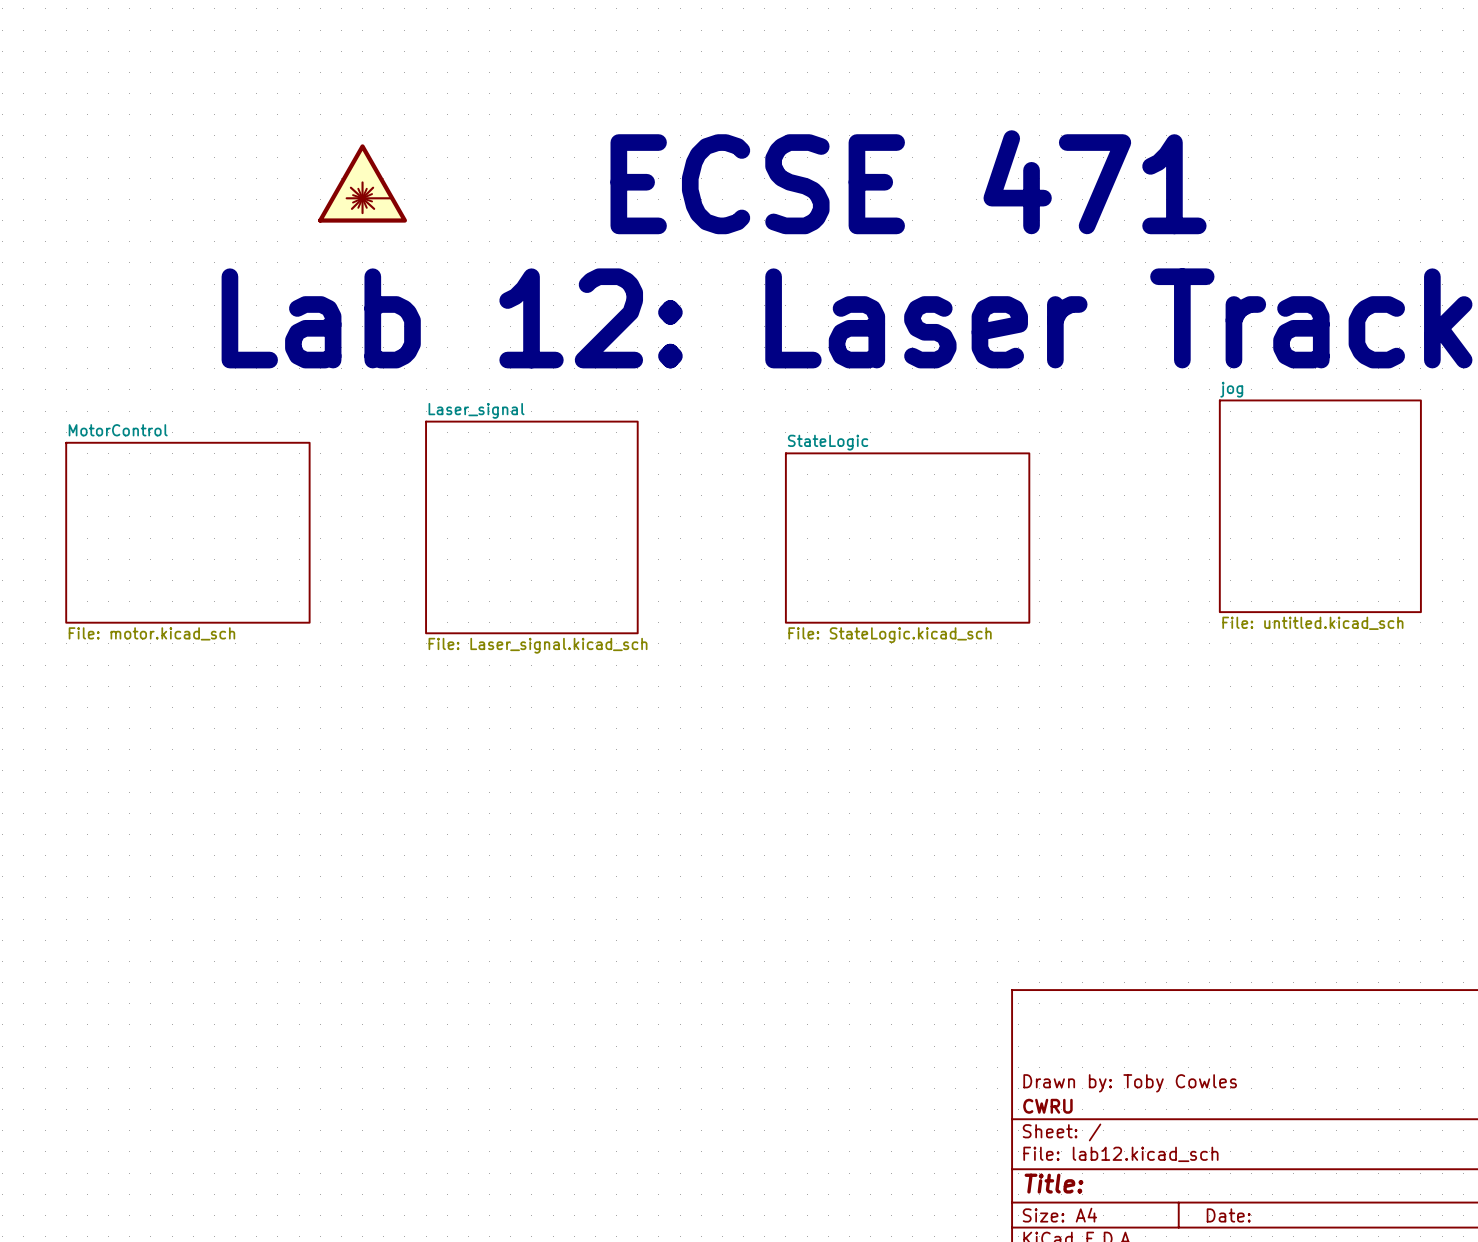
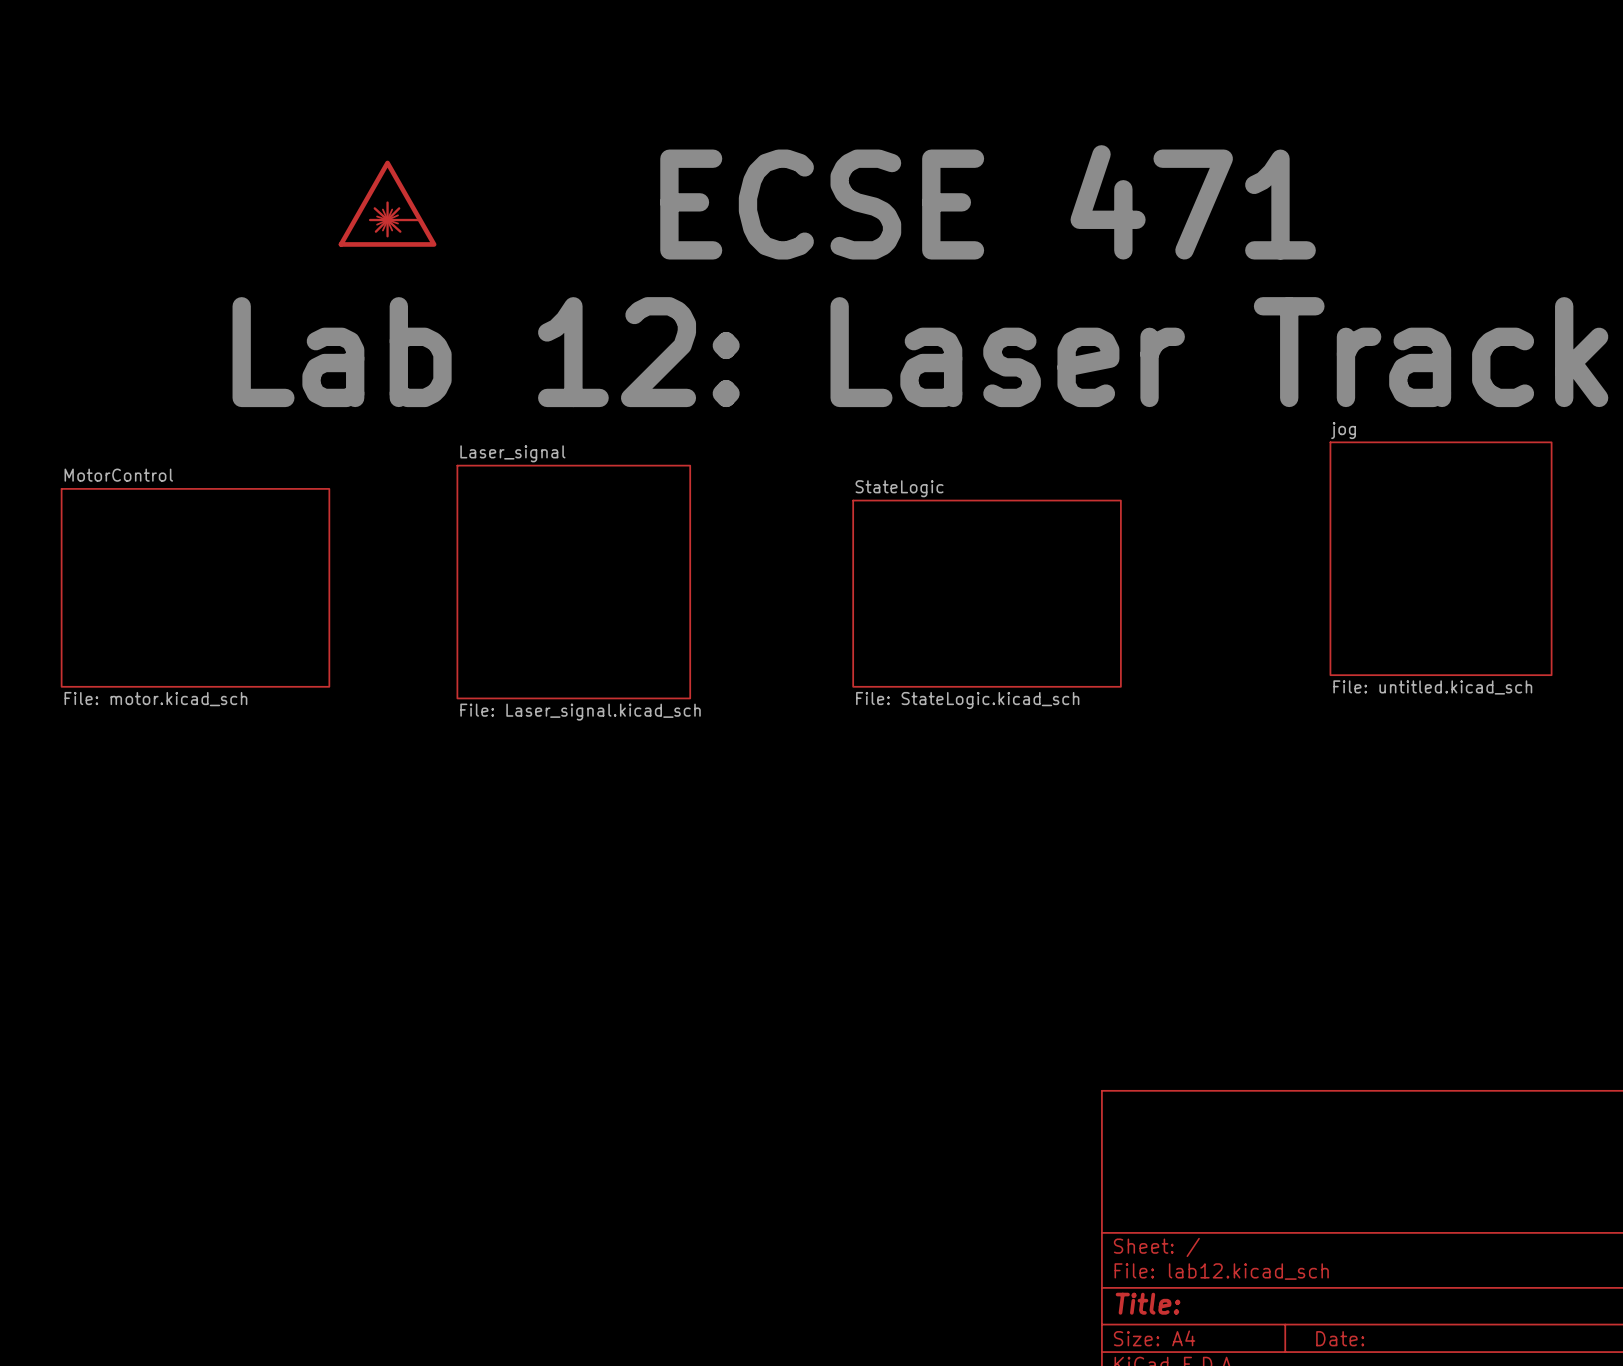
title block: Drawn by: Toby Cowles (1130, 1083) -> none
title block: CWRU (1047, 1106) -> none

